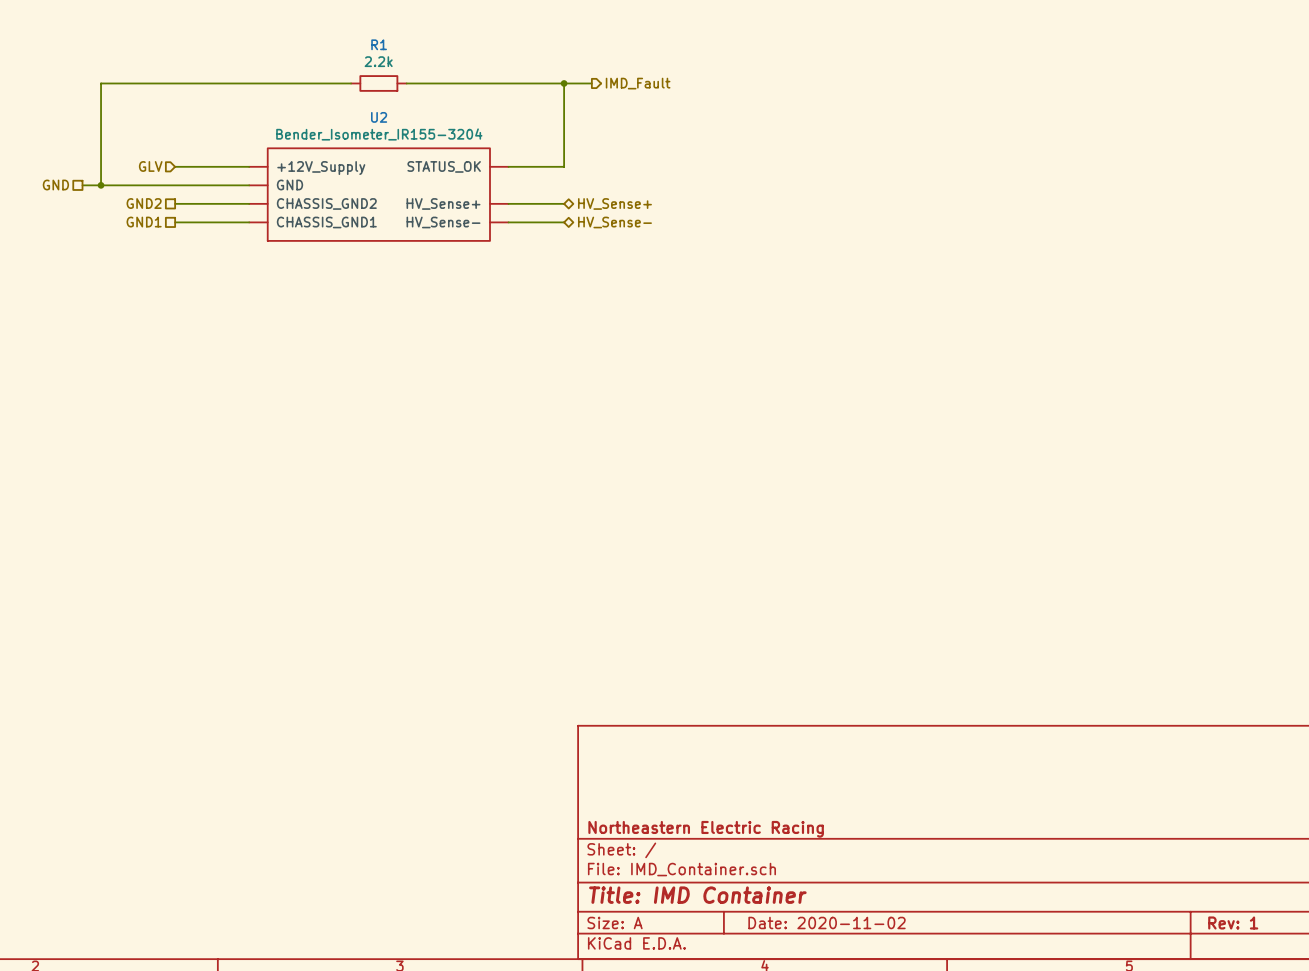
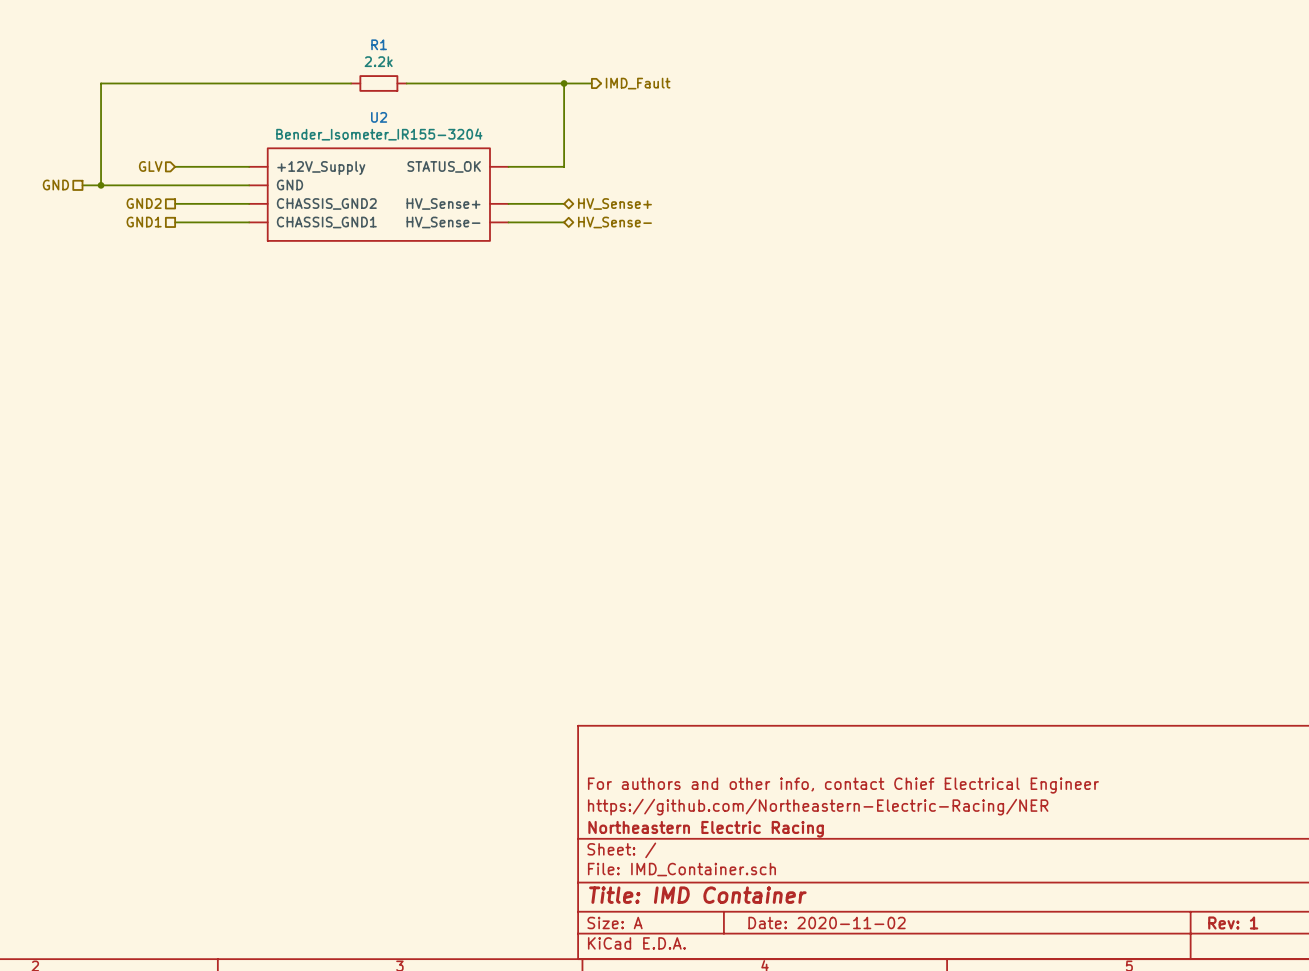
title block: none -> For authors and other info, contact Chief Electrical Engineer (843, 785)
title block: none -> https://github.com/Northeastern-Electric-Racing/NER (818, 807)

